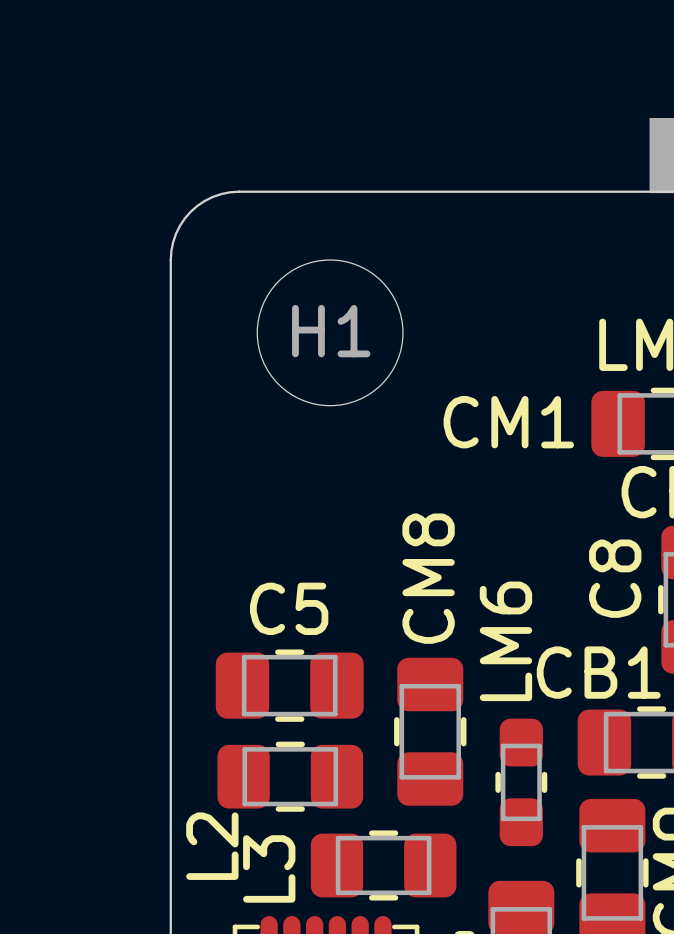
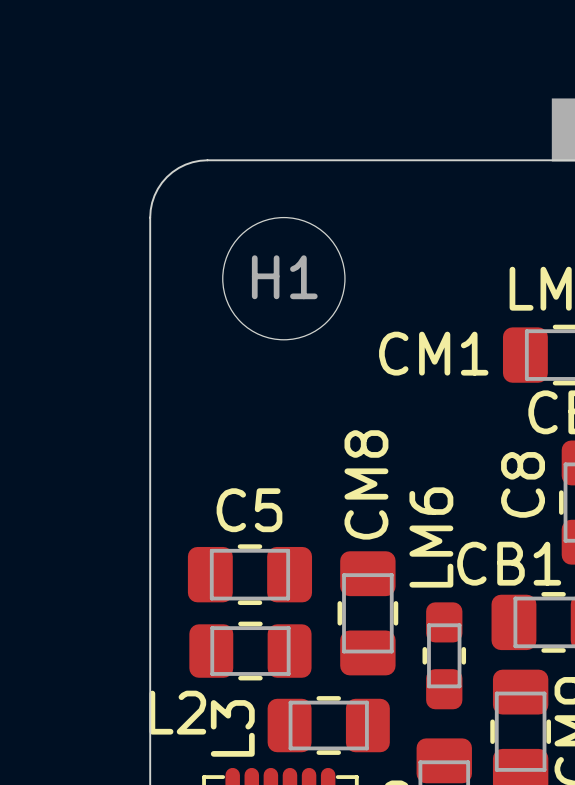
L2 name rotation: 0° (212, 846) -> 90° clockwise (177, 712)

